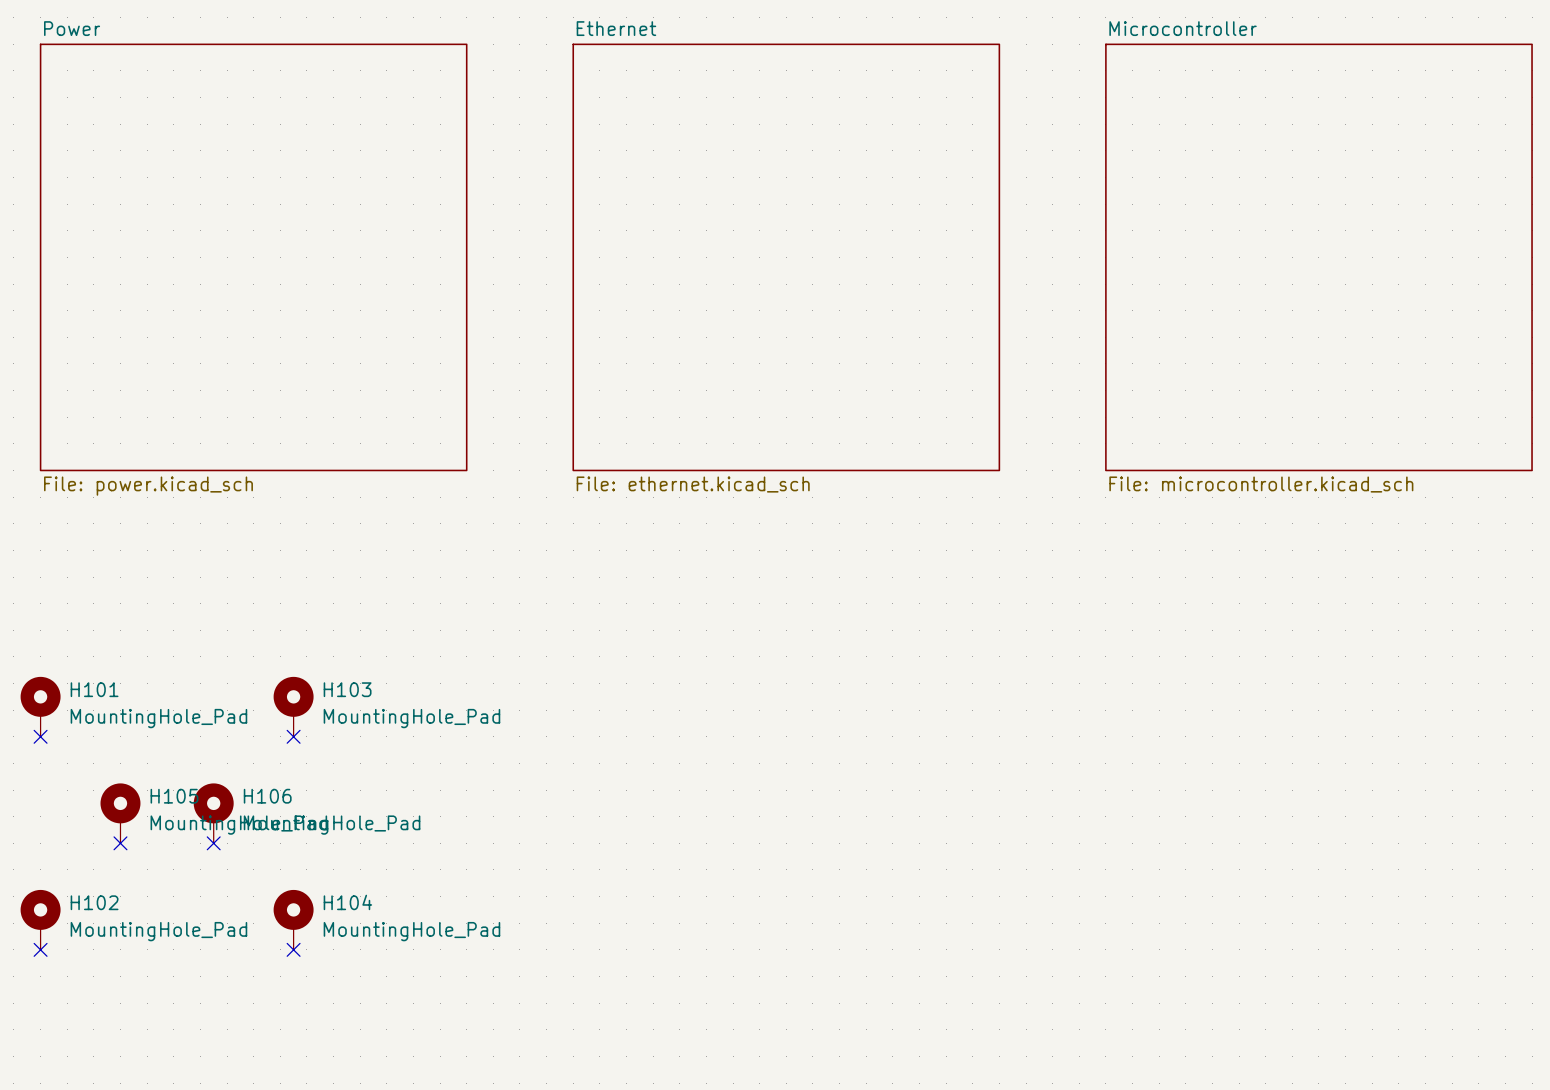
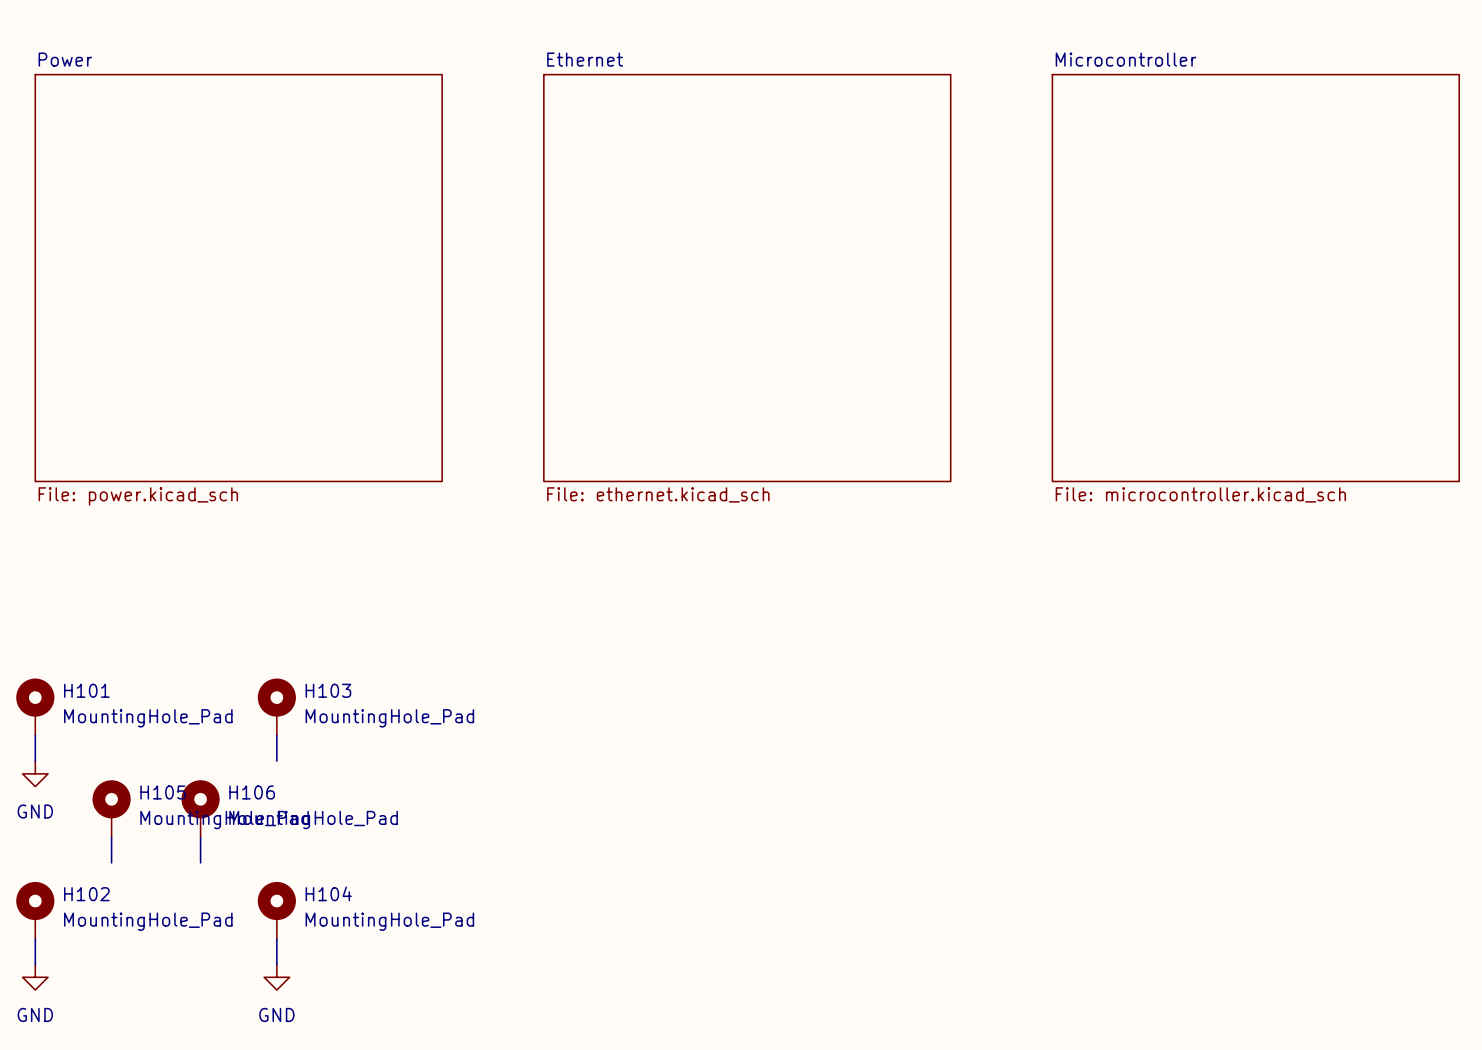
wire: none -> (35, 735) (35, 761)
no-connect mark: (40, 736) -> none
wire: none -> (276, 735) (276, 761)
no-connect mark: (293, 736) -> none
power symbol: none -> GND (35, 773)
wire: none -> (111, 837) (111, 862)
no-connect mark: (120, 843) -> none
wire: none -> (200, 837) (200, 862)
no-connect mark: (213, 843) -> none
wire: none -> (35, 939) (35, 964)
no-connect mark: (40, 949) -> none
wire: none -> (276, 939) (276, 964)
no-connect mark: (293, 949) -> none
power symbol: none -> GND (35, 977)
power symbol: none -> GND (276, 977)

